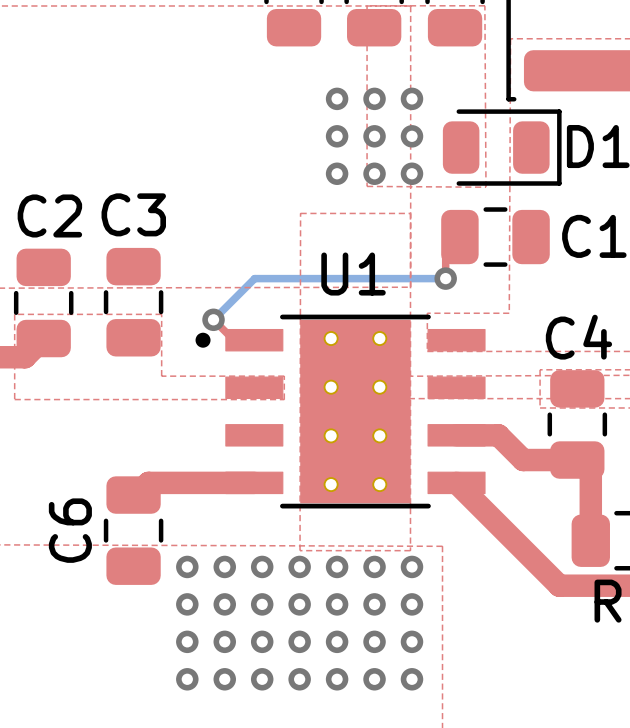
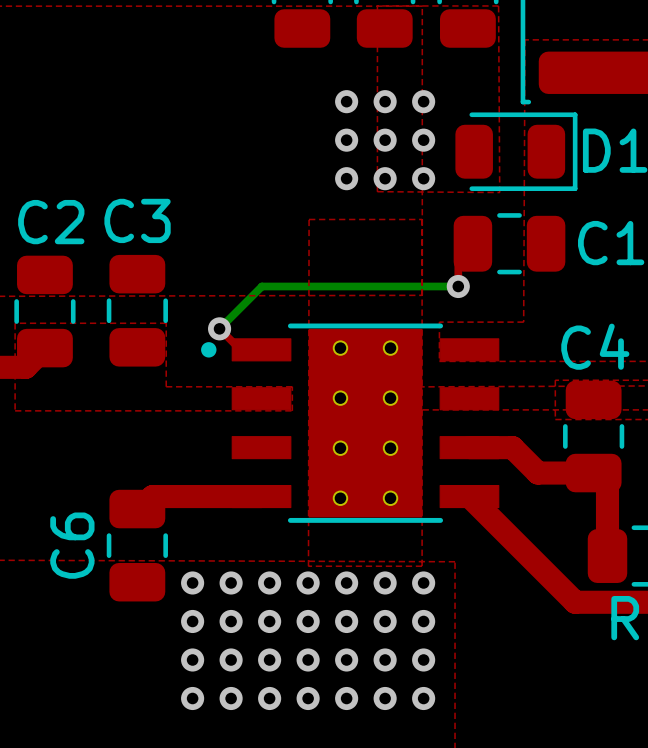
U1 name: U1 (353, 274) -> none

